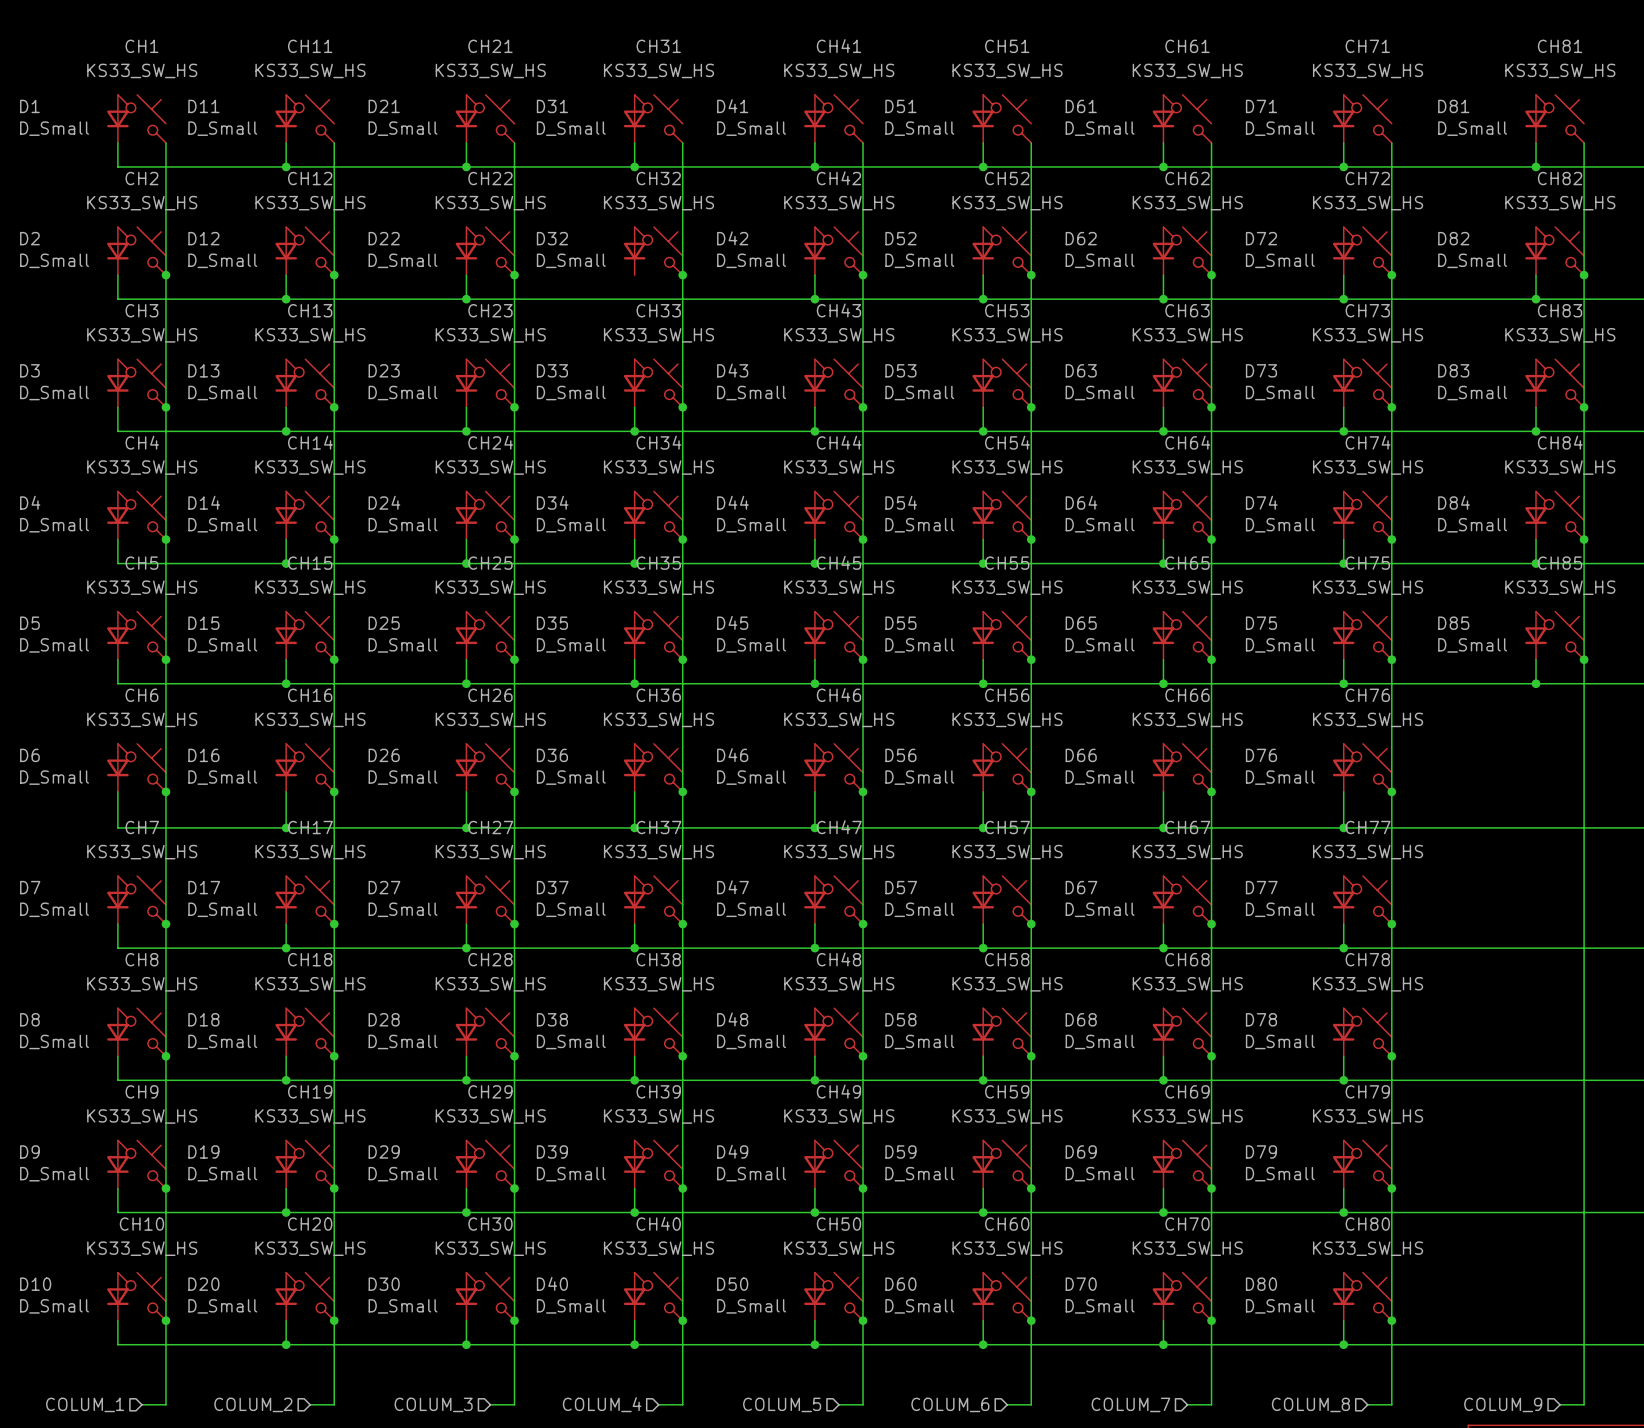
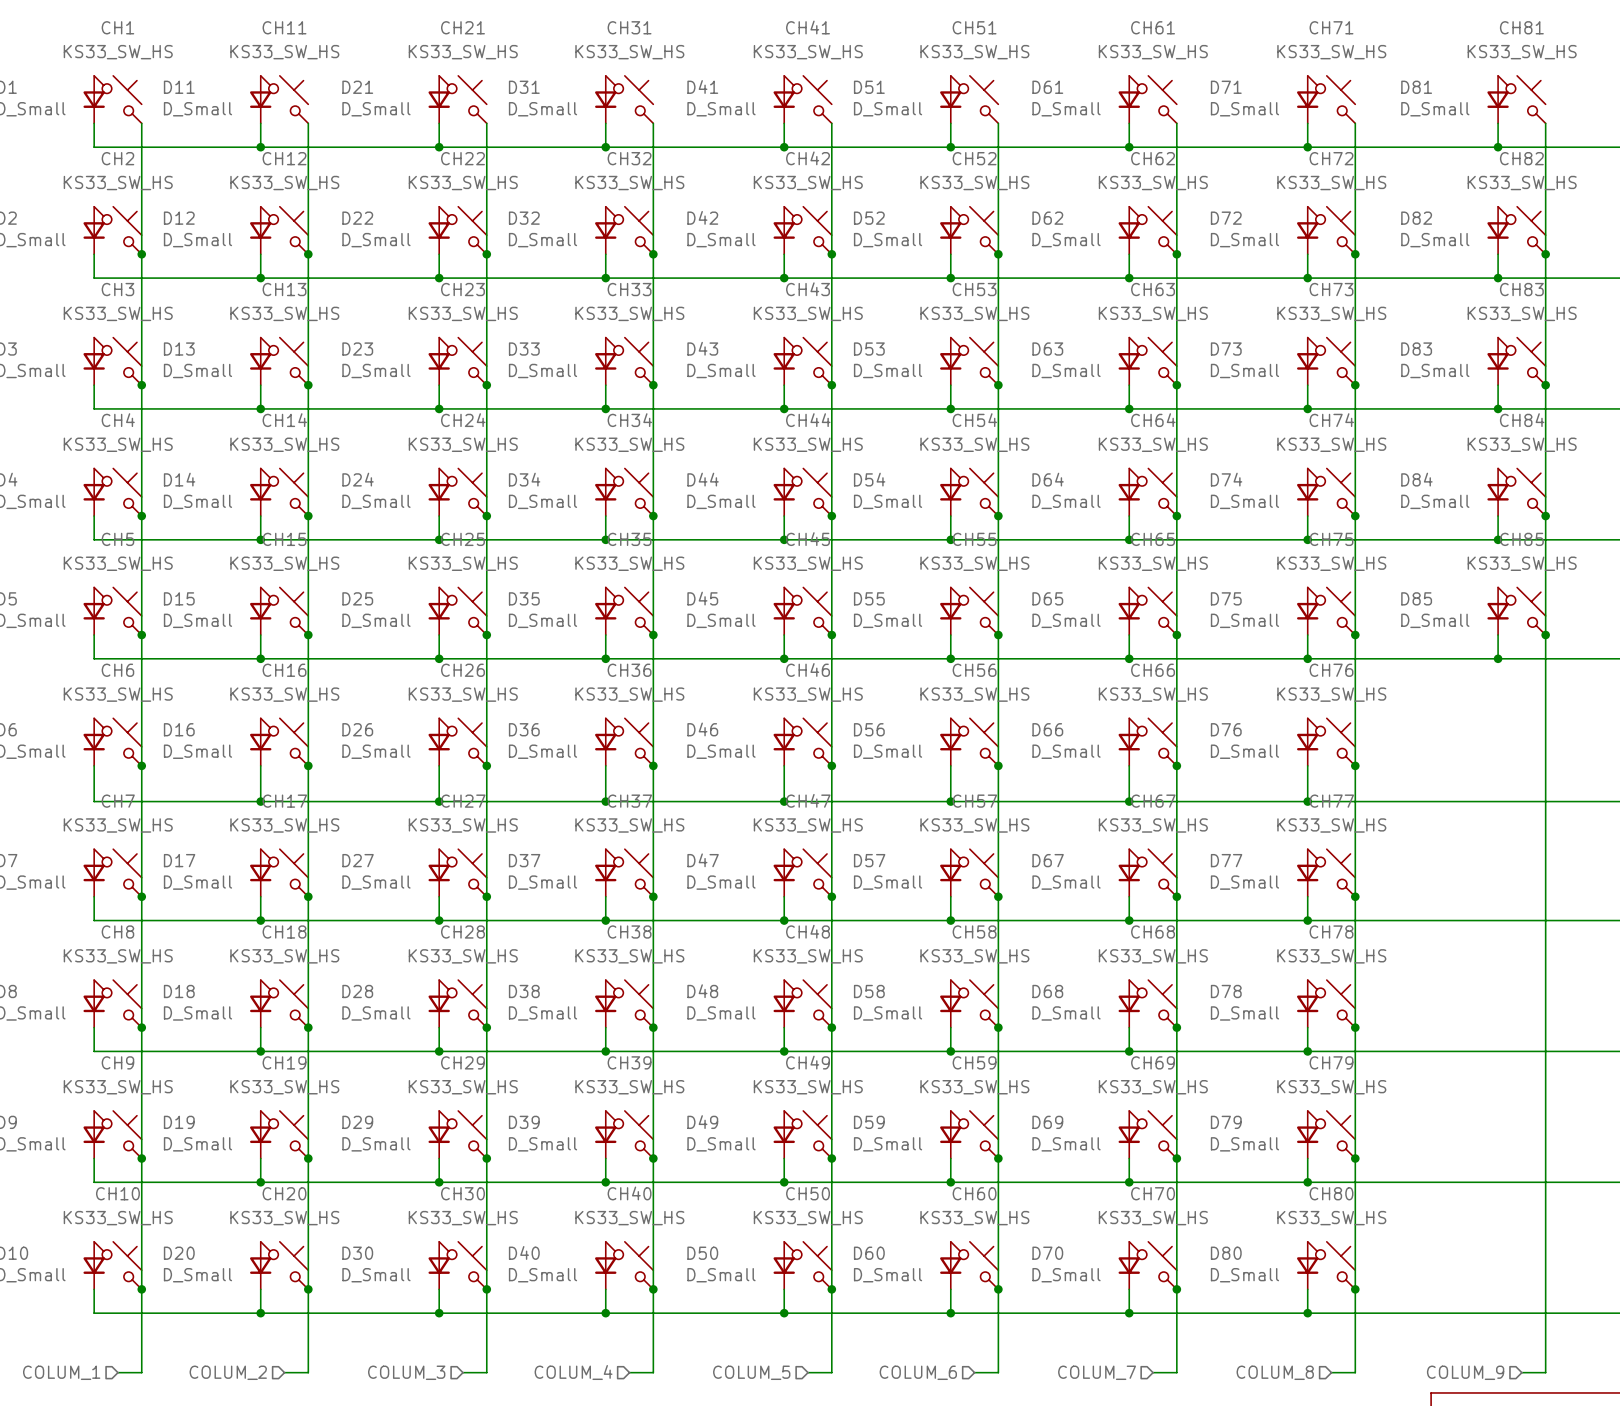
wire: none -> (605, 254) (605, 278)
junction: none -> (605, 278)

